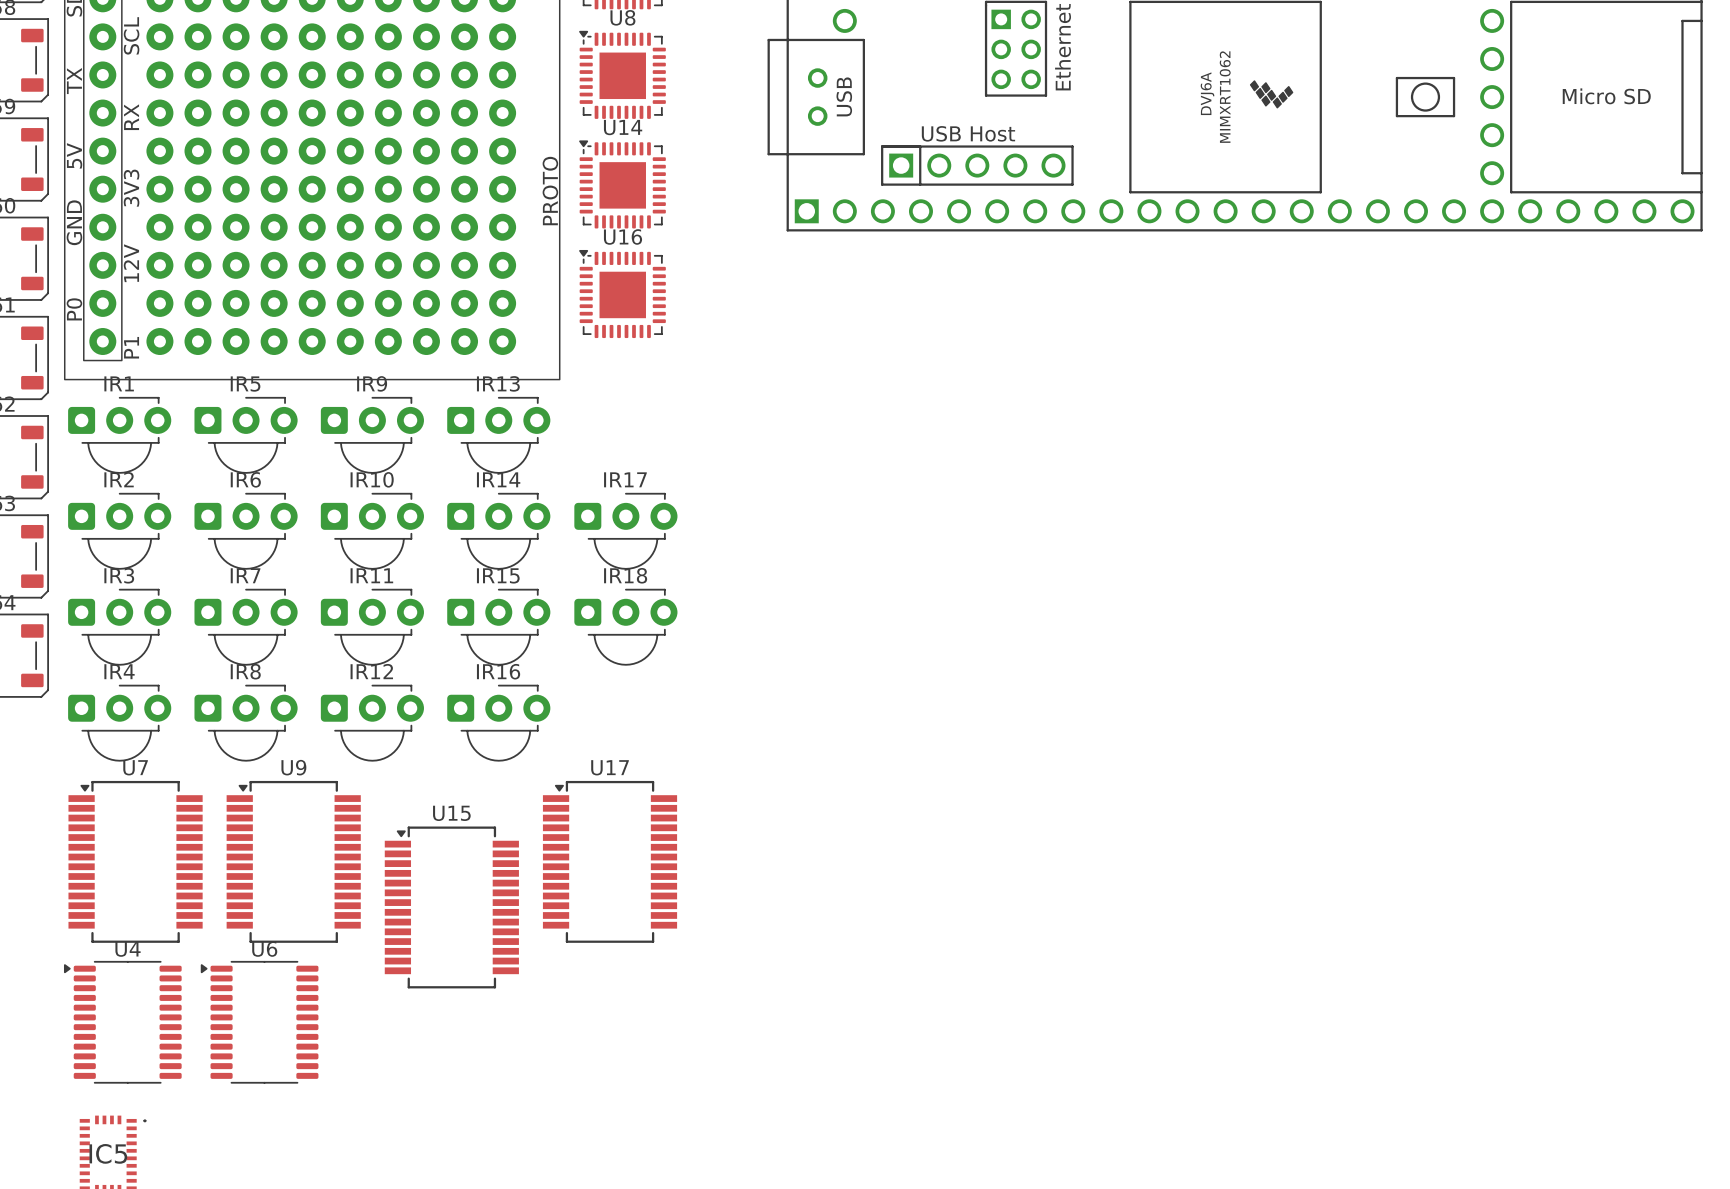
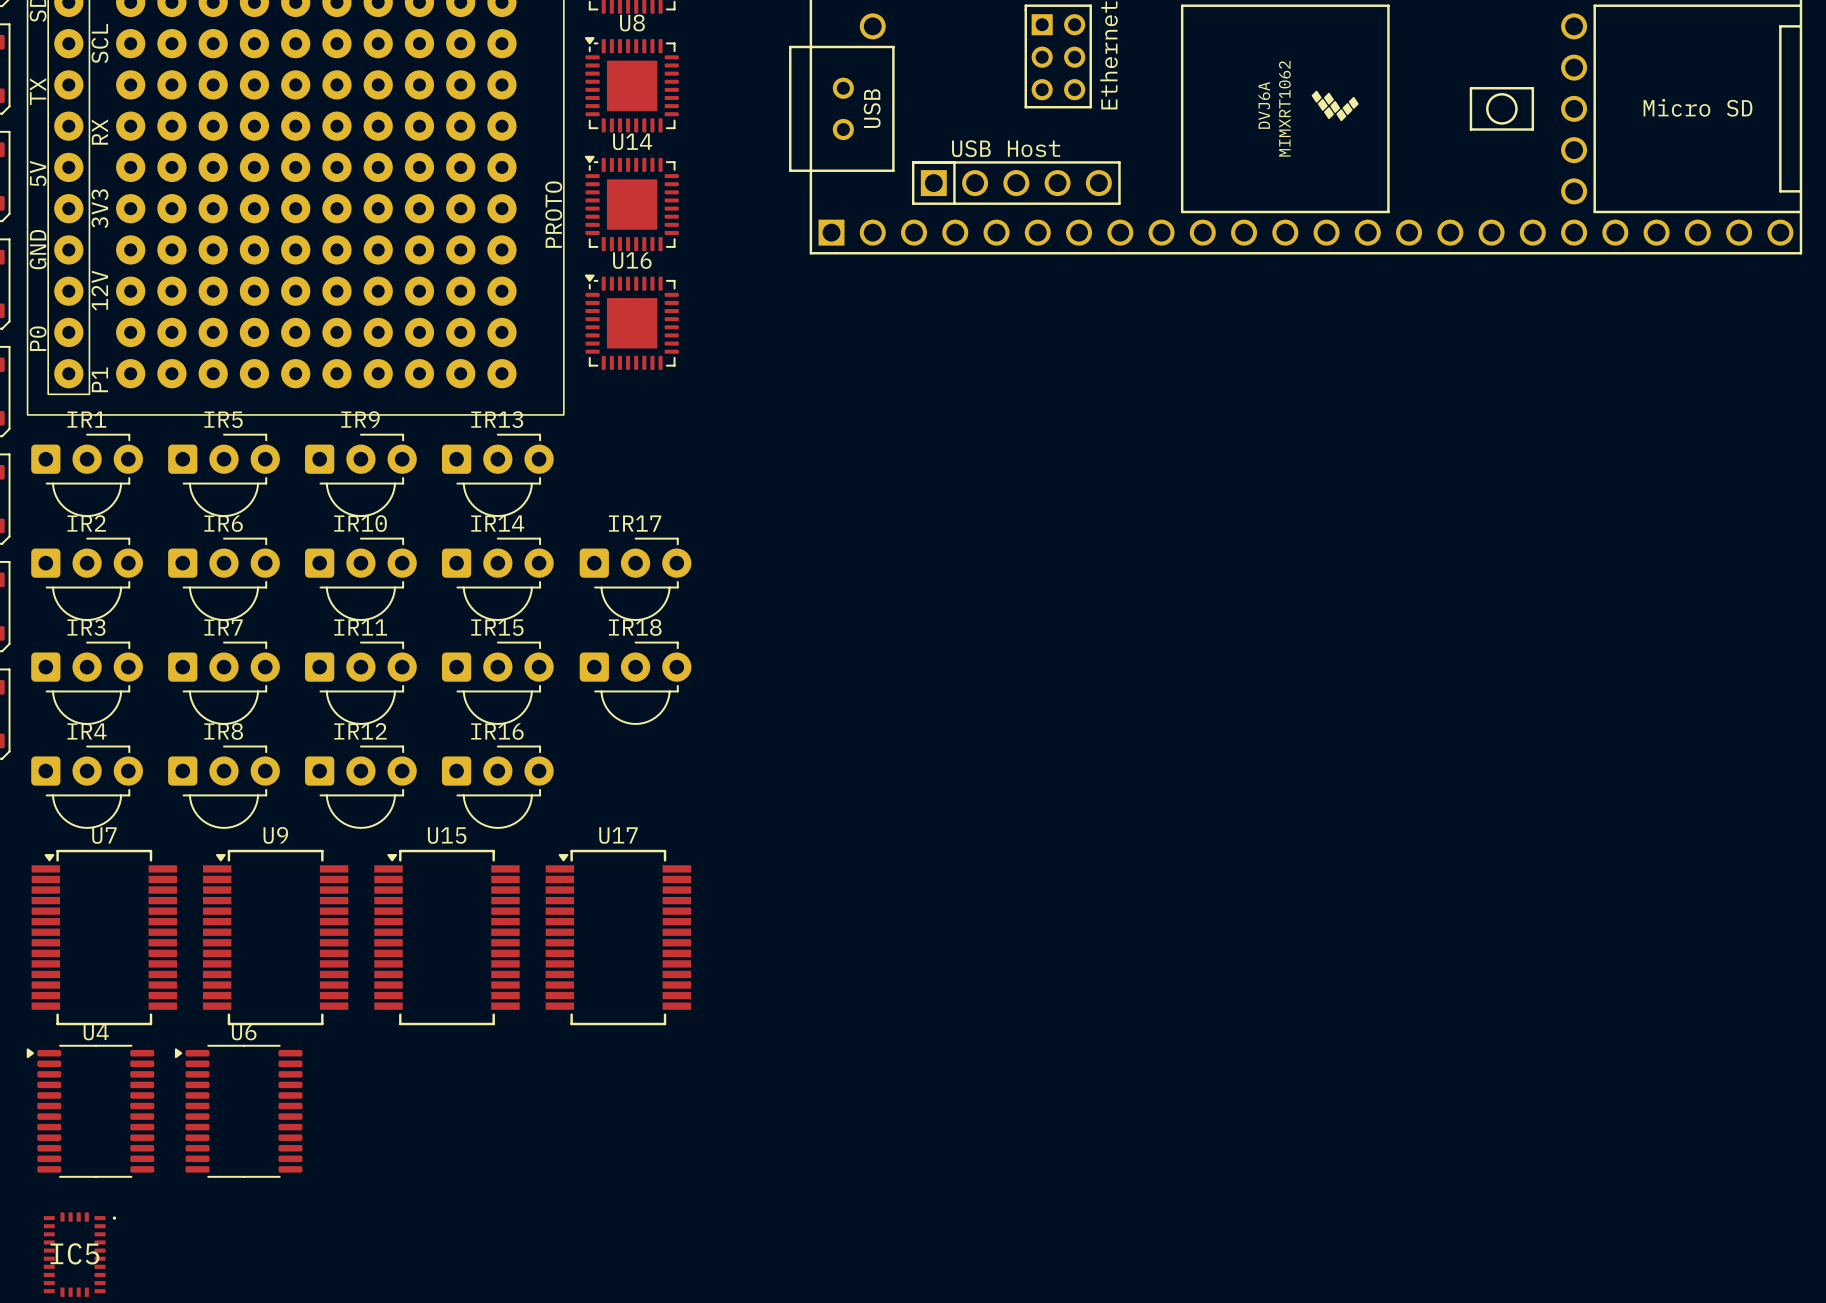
U15 position: (451, 907) -> (446, 937)

